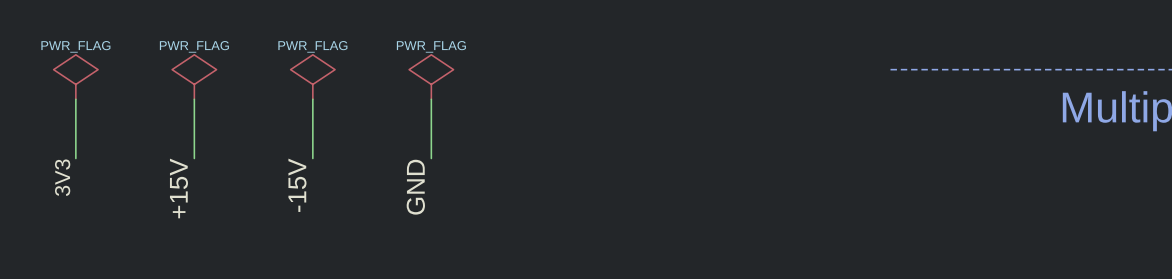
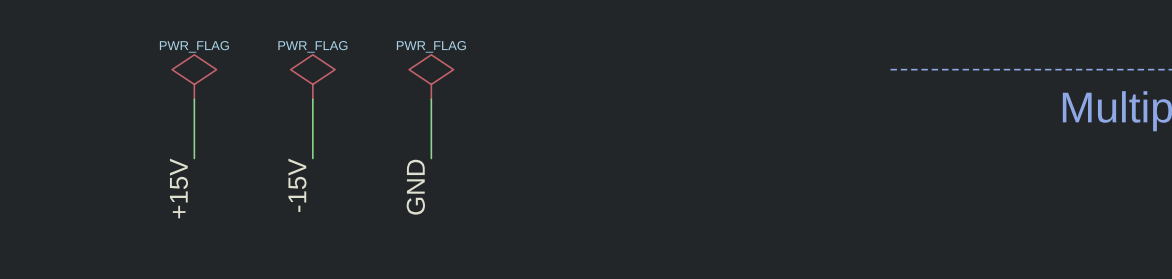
power symbol: PWR_FLAG (75, 77) -> none
wire: (75, 99) (75, 158) -> none
label: 3V3 (62, 177) -> none

